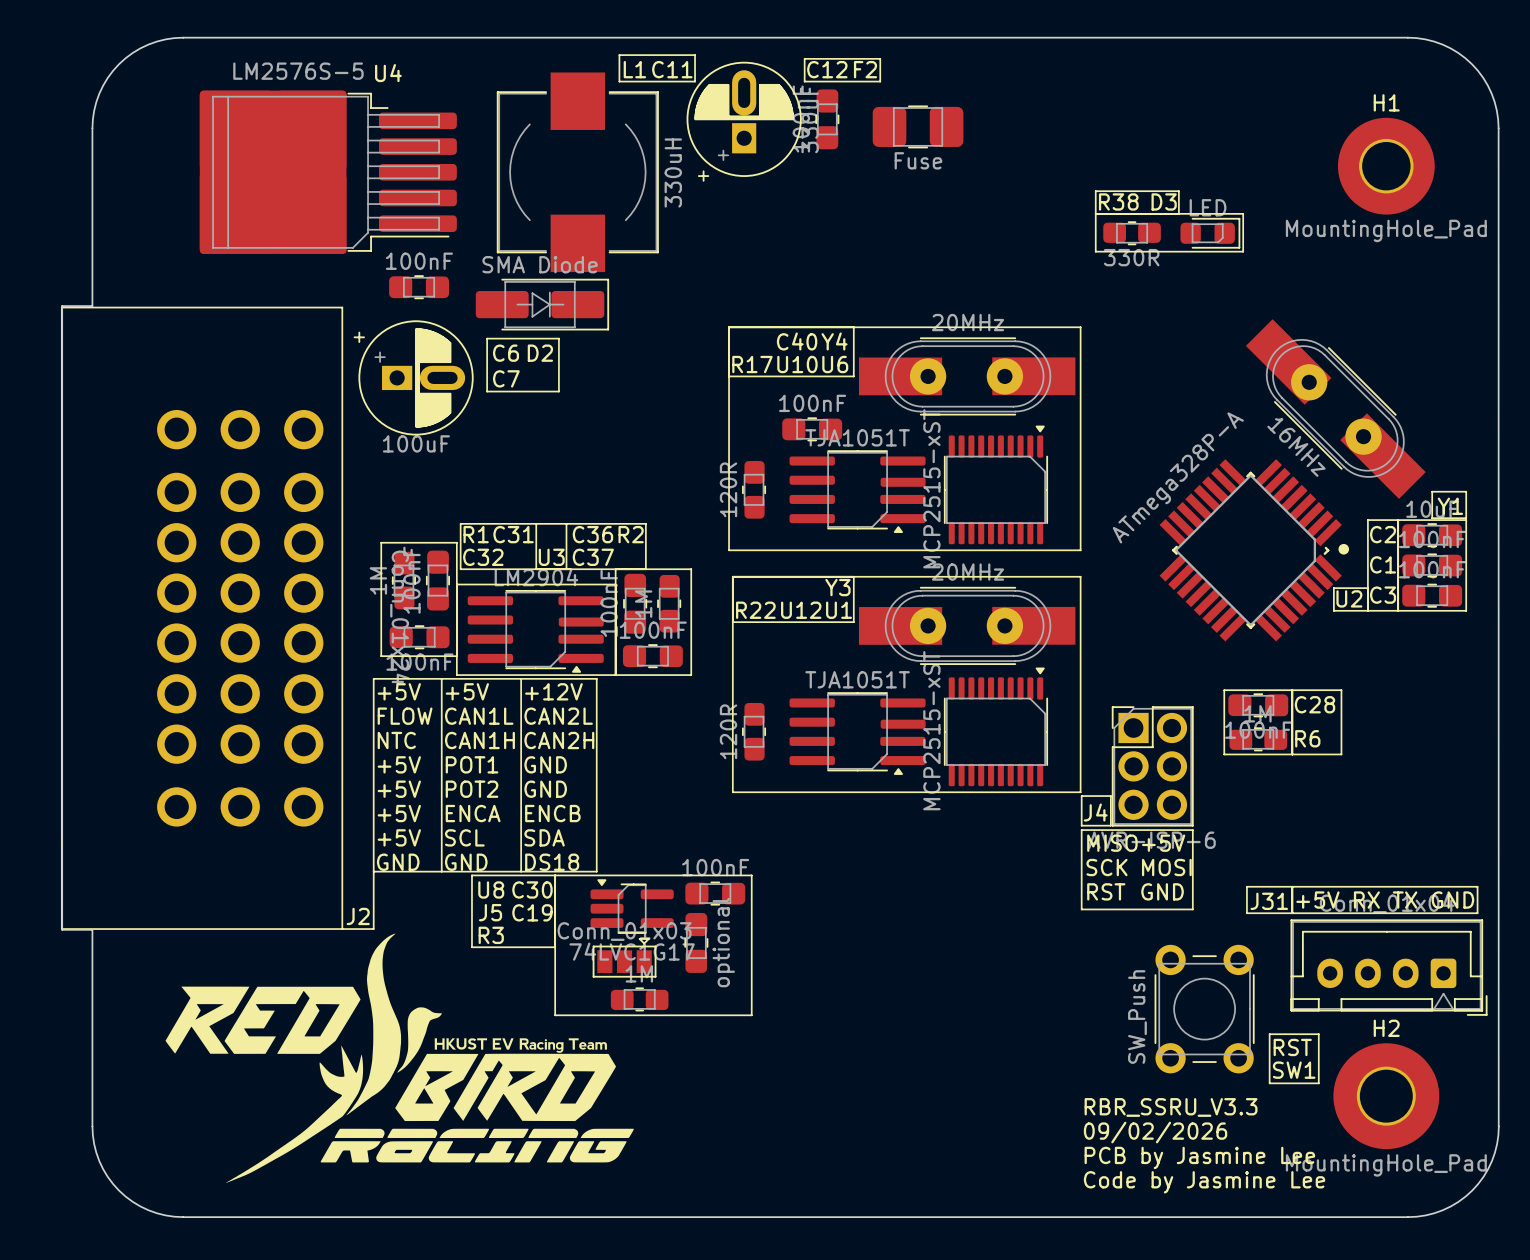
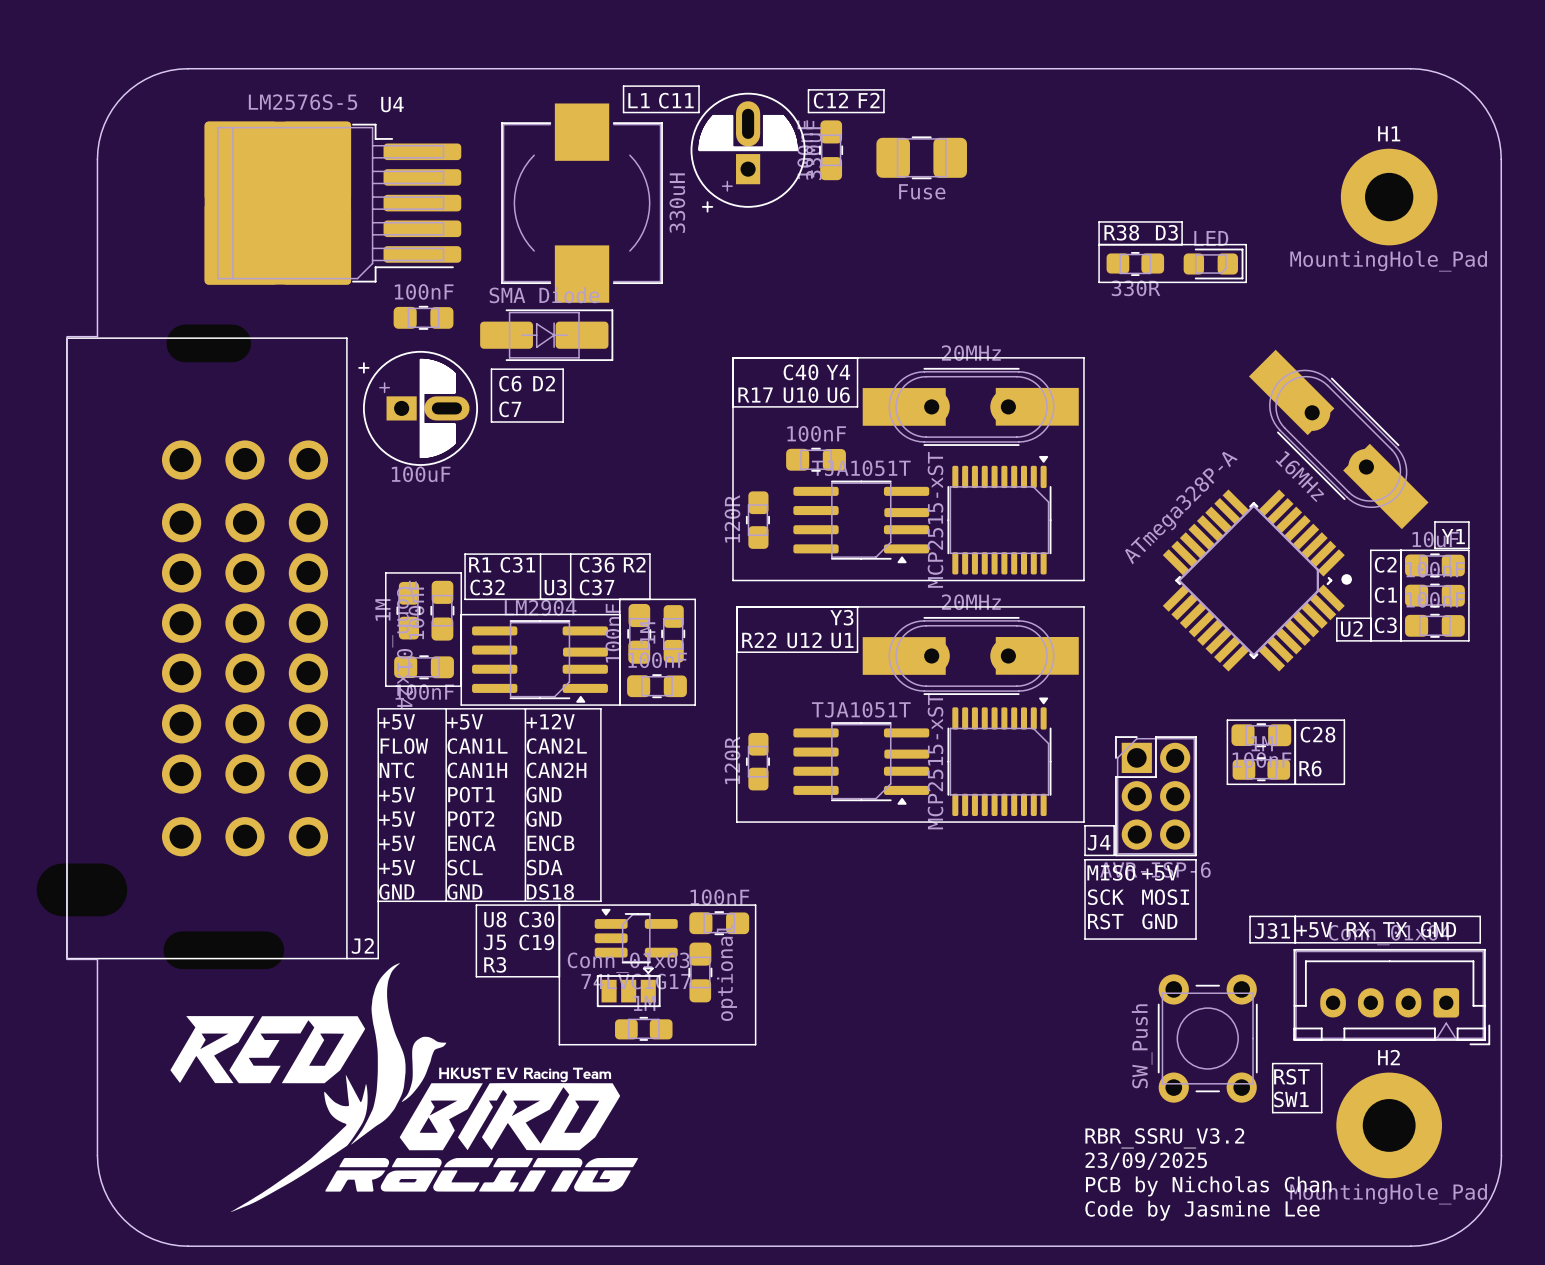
text: RBR_SSRU_V3.3 (1171, 1107) -> RBR_SSRU_V3.2 (1164, 1138)
text: 09/02/2026 (1155, 1132) -> 23/09/2025 (1146, 1161)
text: PCB by Jasmine Lee (1199, 1157) -> PCB by Nicholas Chan (1208, 1186)

